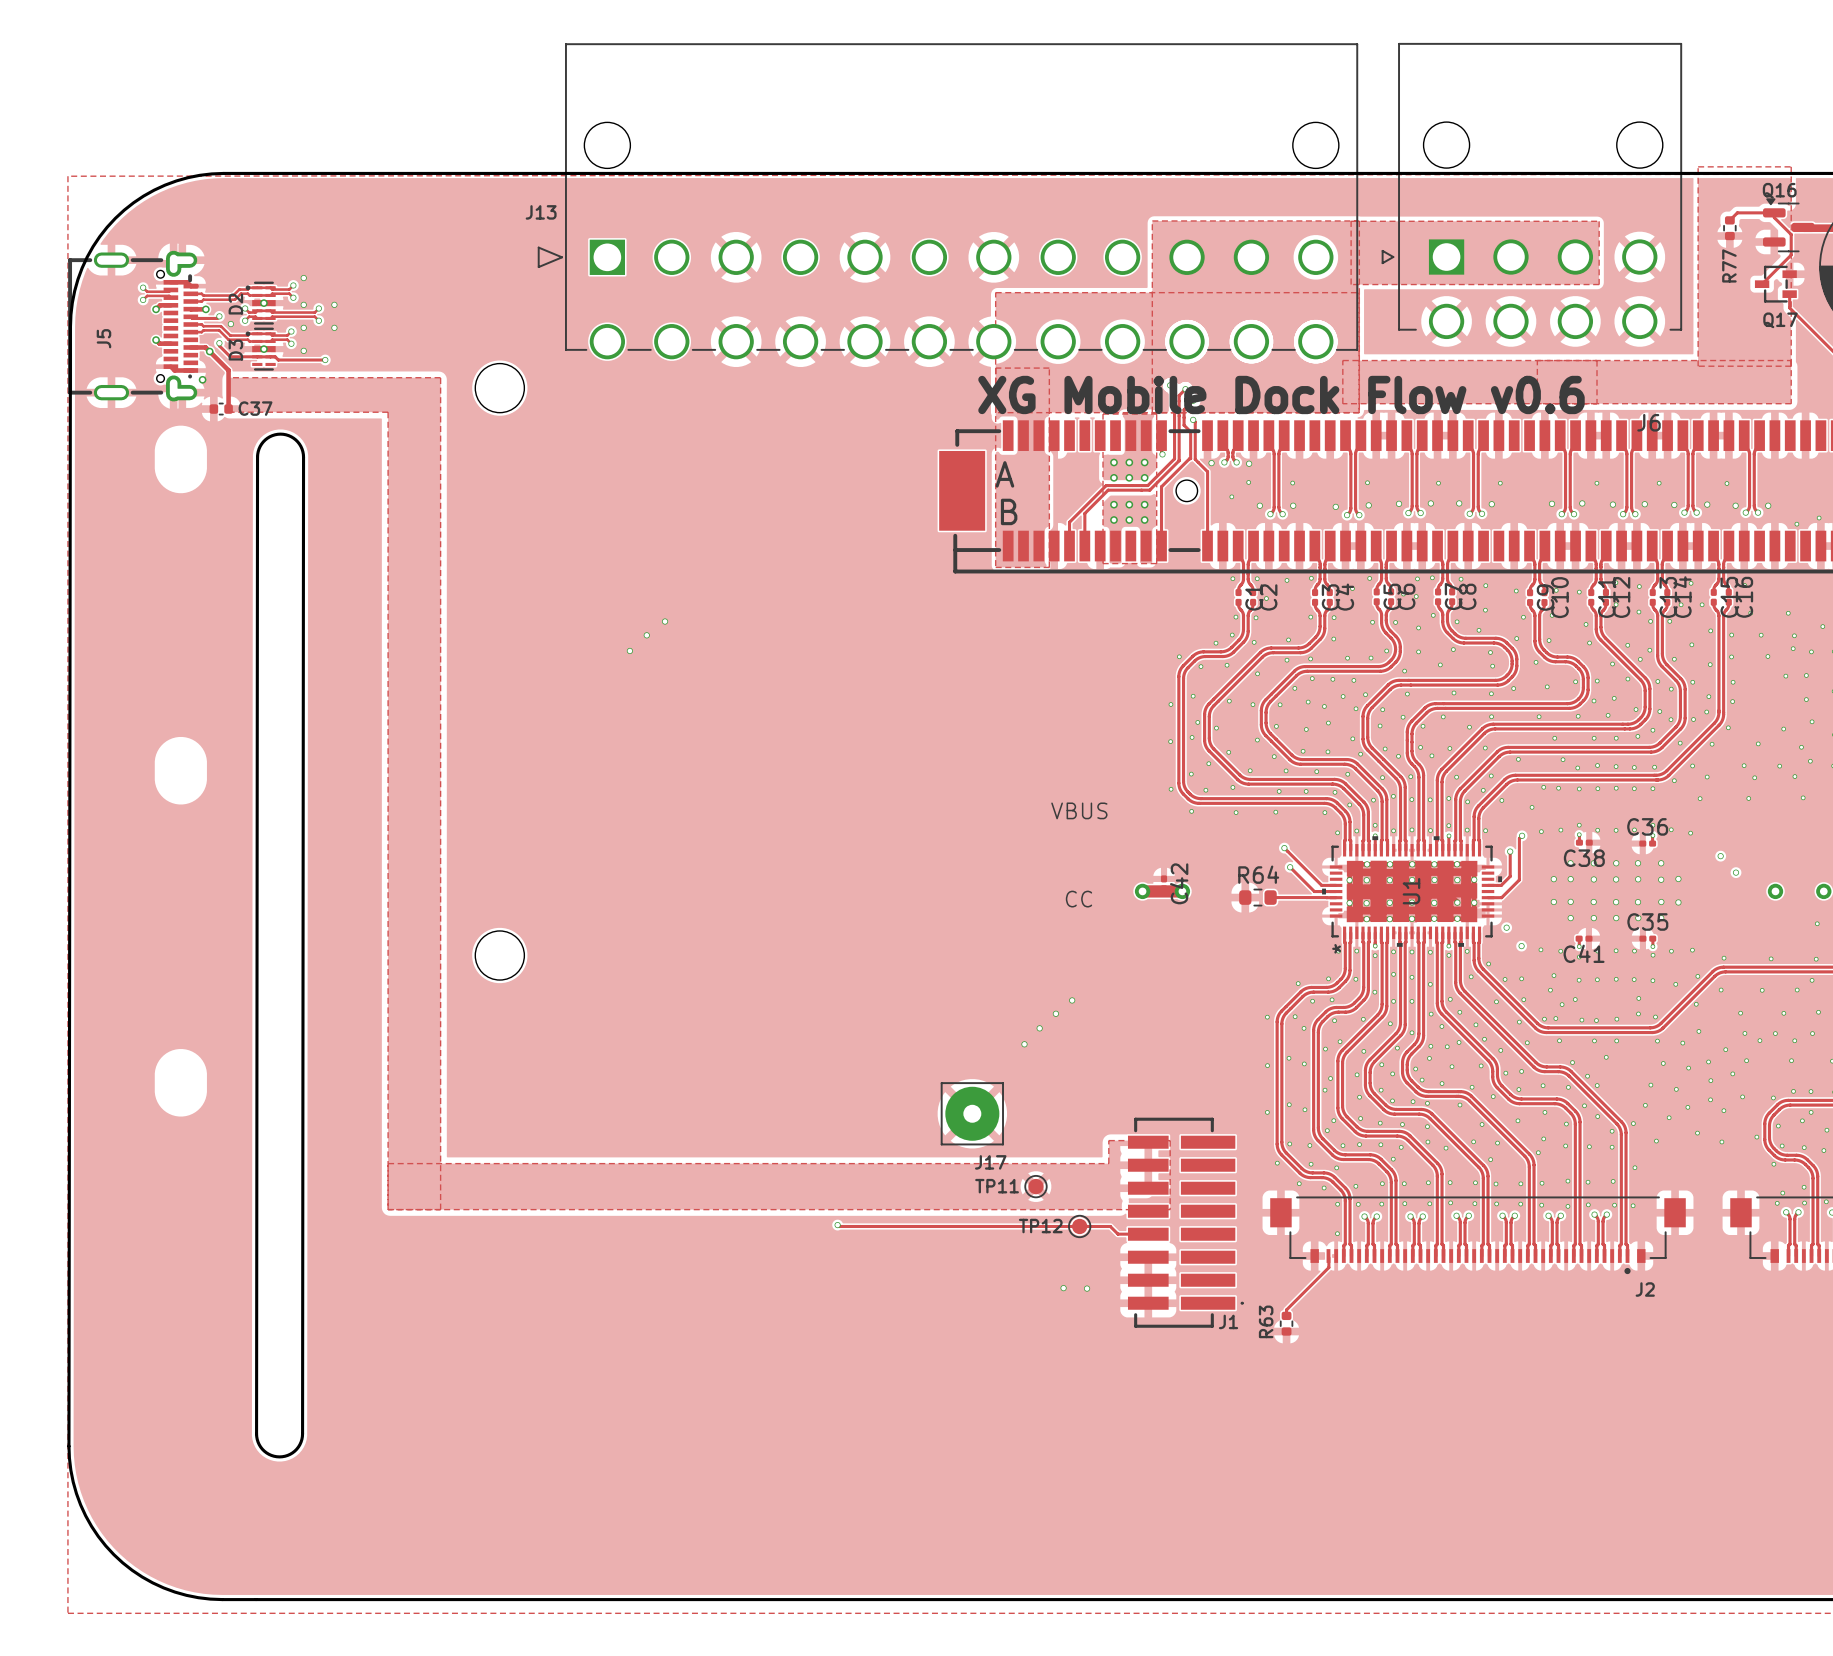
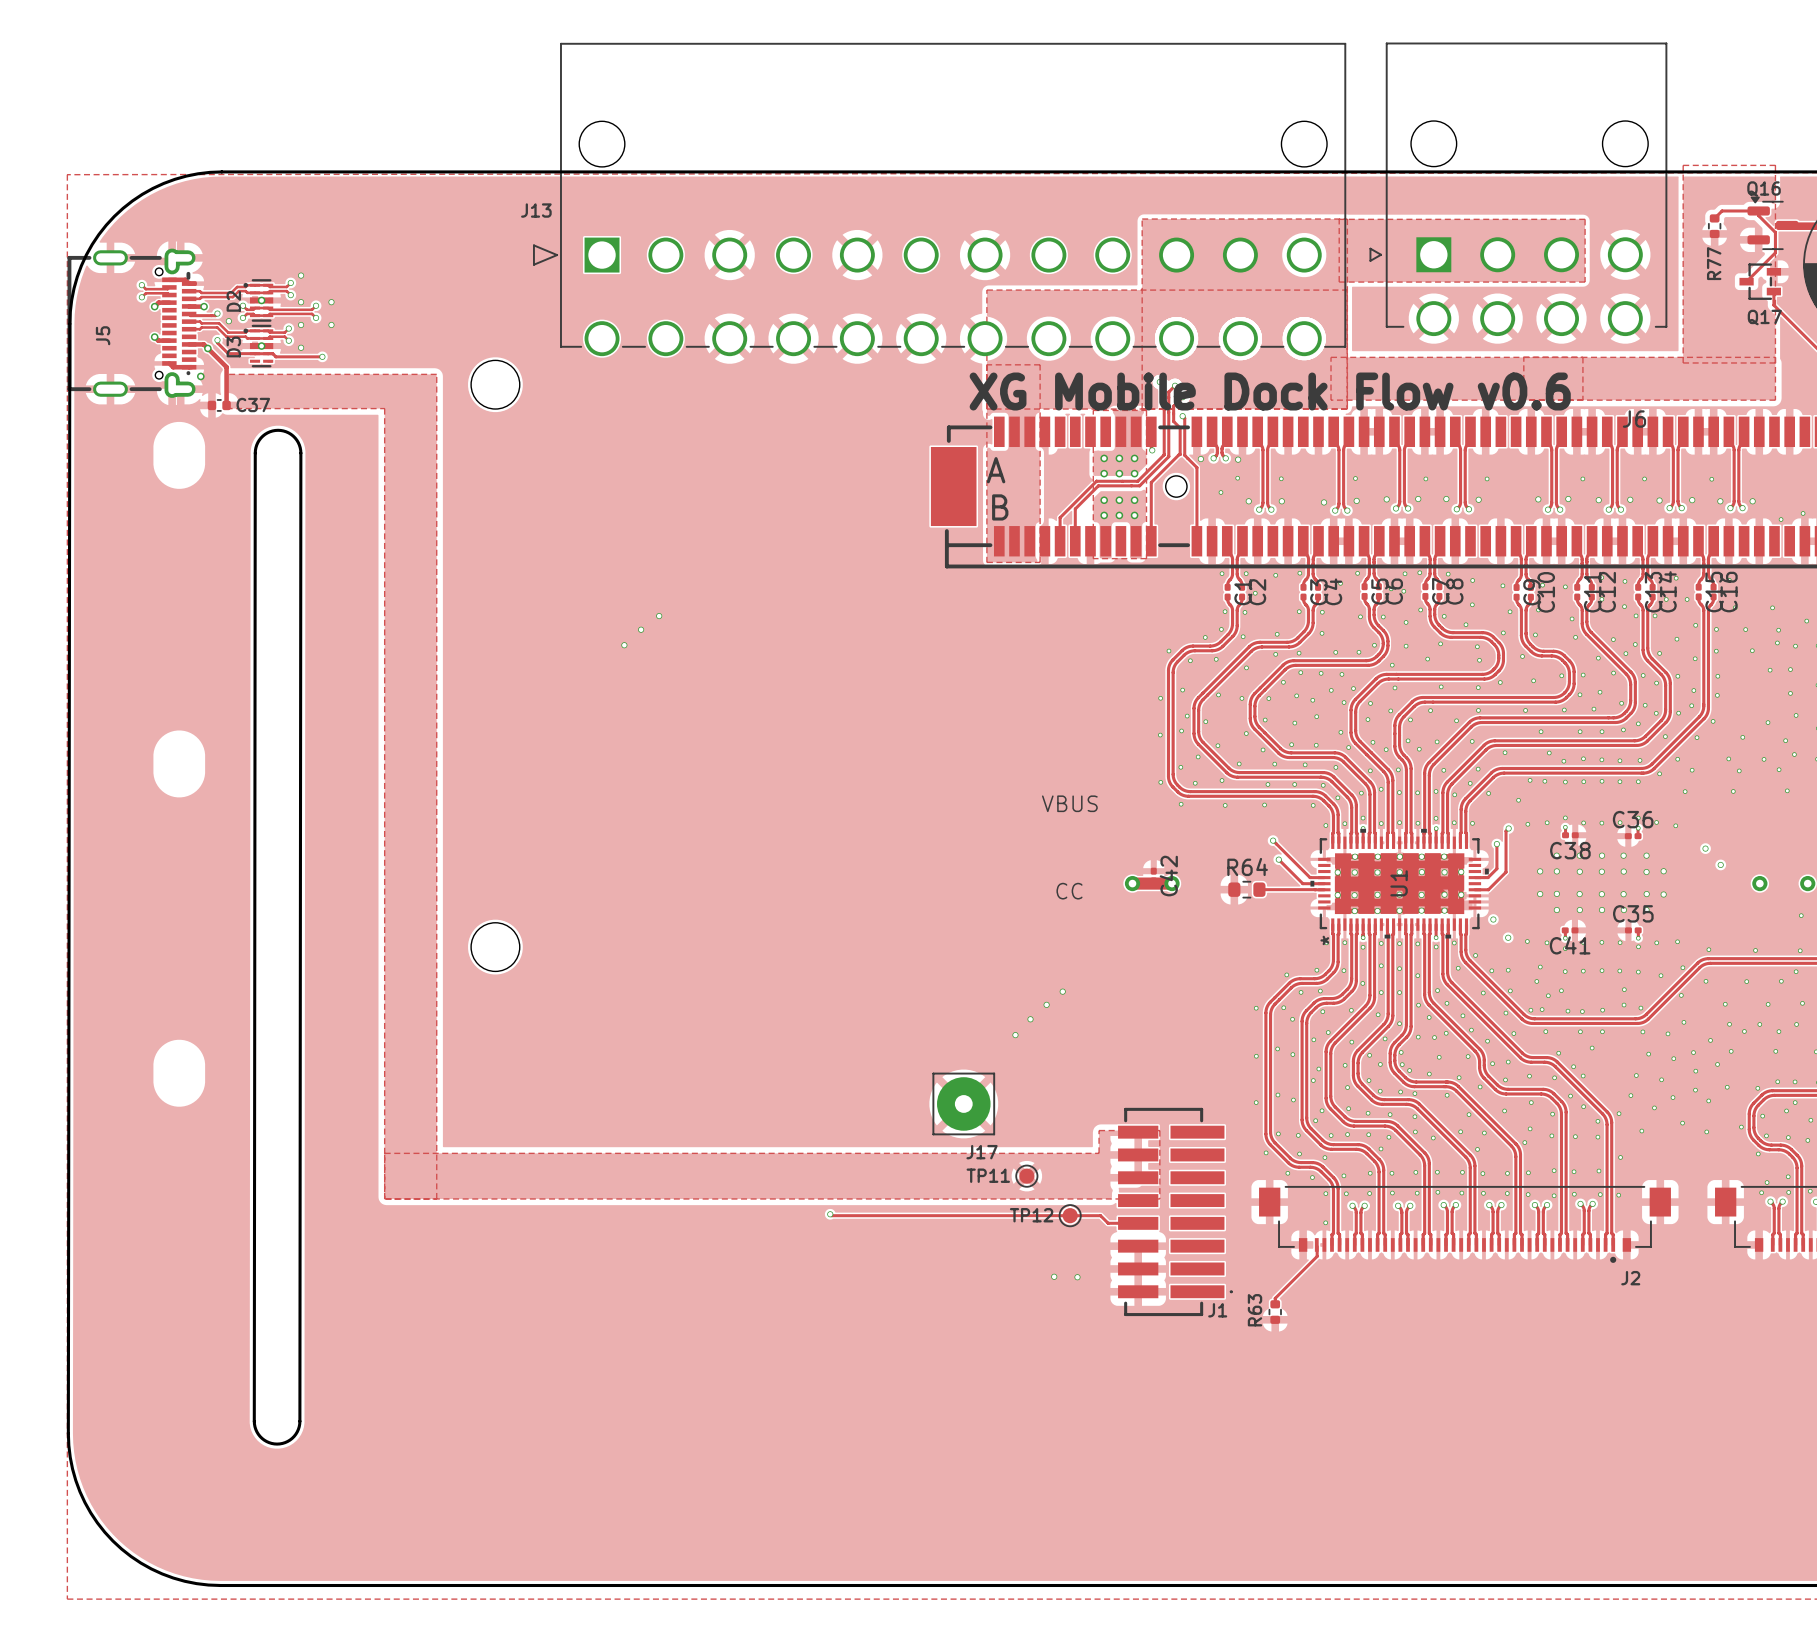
via: (1429, 1058) -> none
via: none -> (1401, 1052)
via: (1415, 1069) -> none
via: none -> (1402, 1064)

